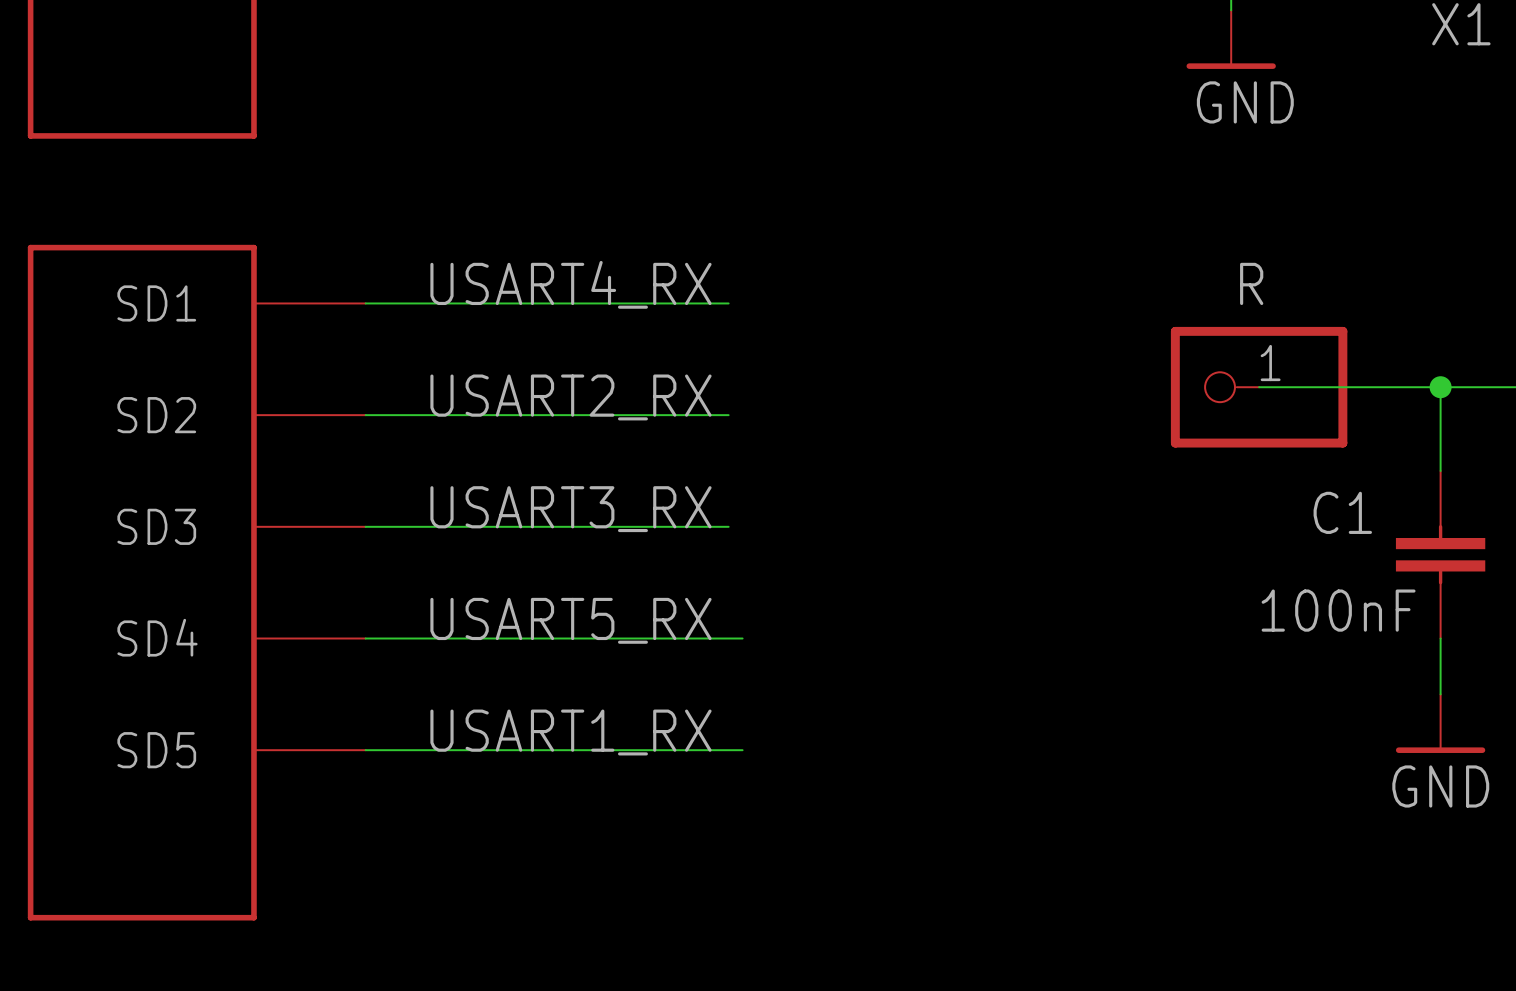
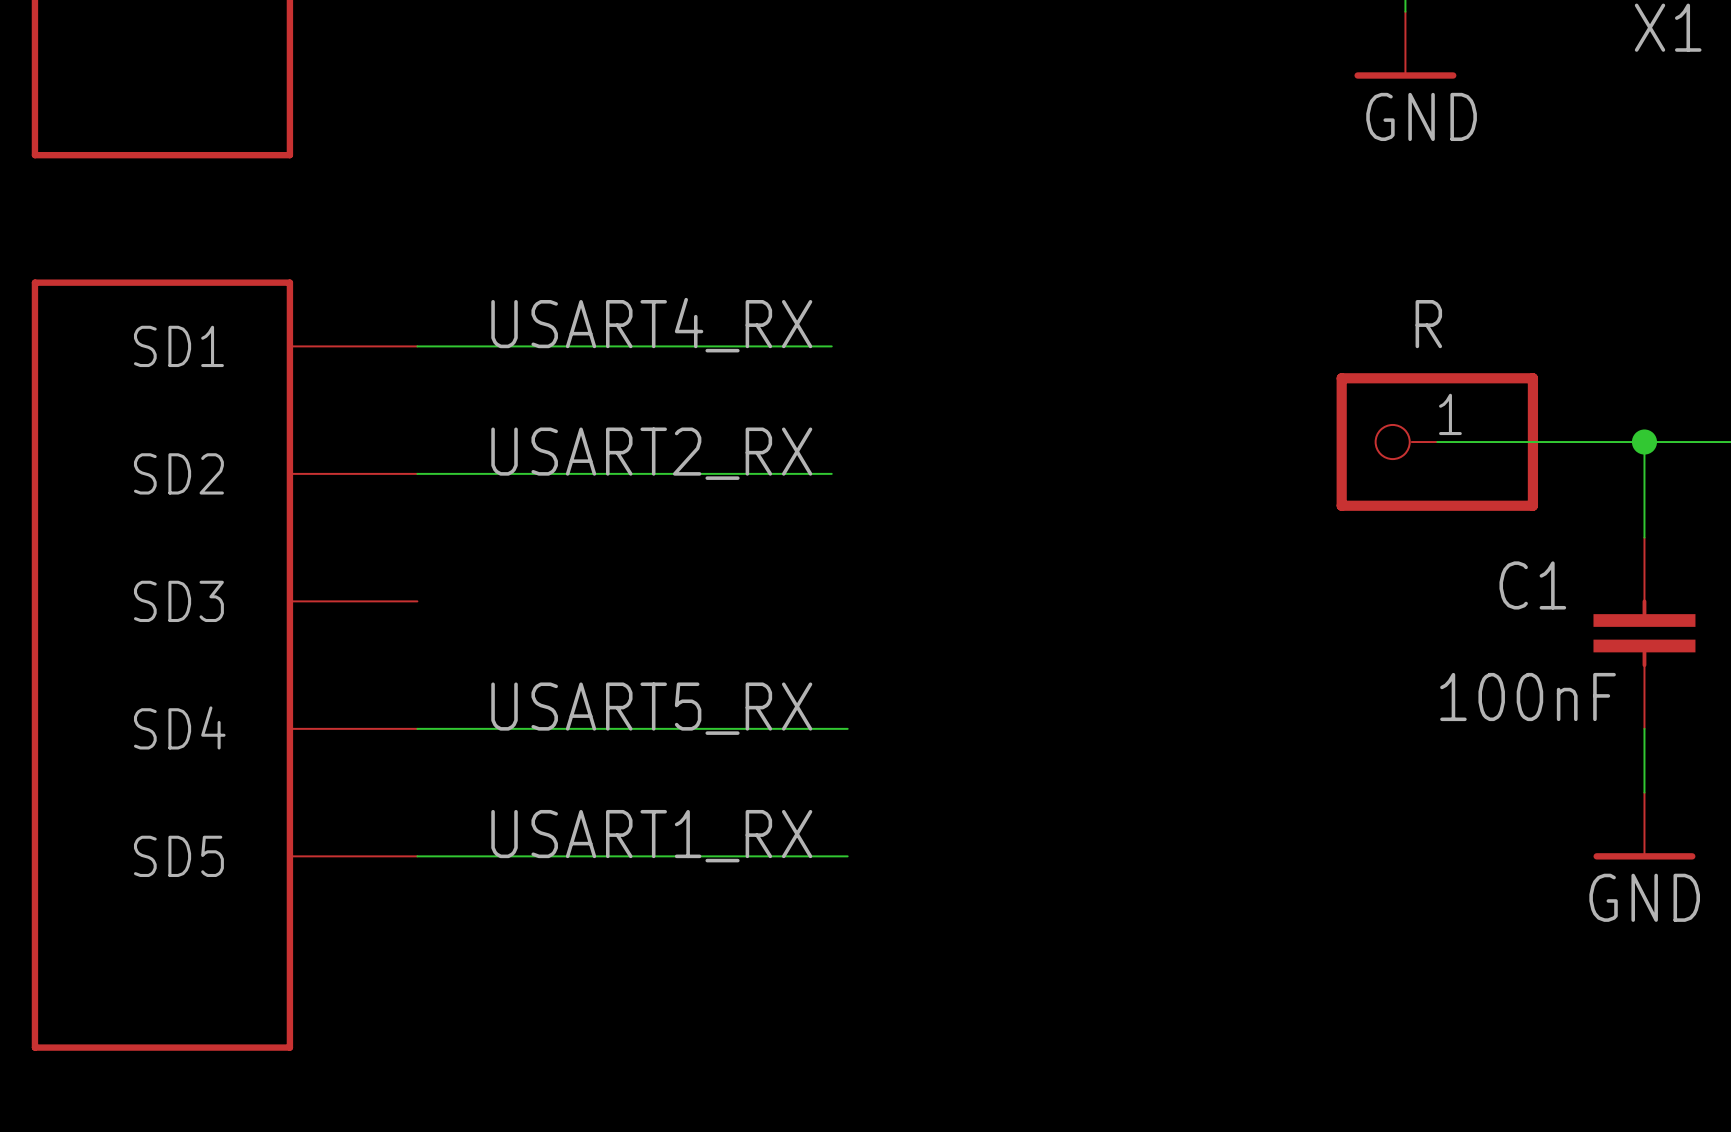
label: USART3_RX (570, 509) -> none
wire: (365, 526) (728, 526) -> none

